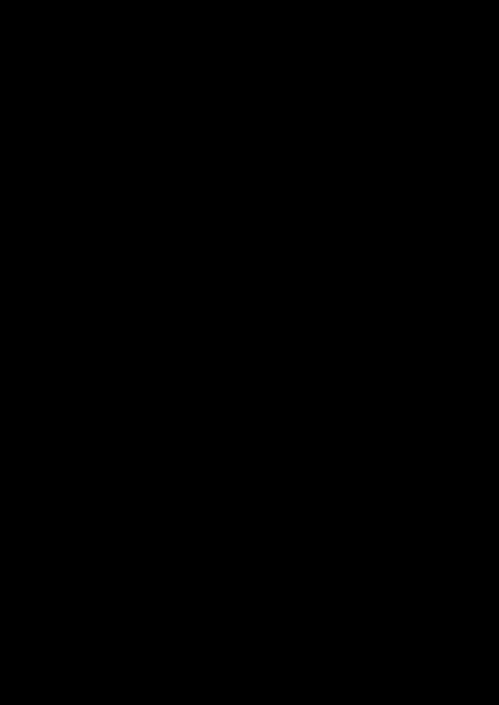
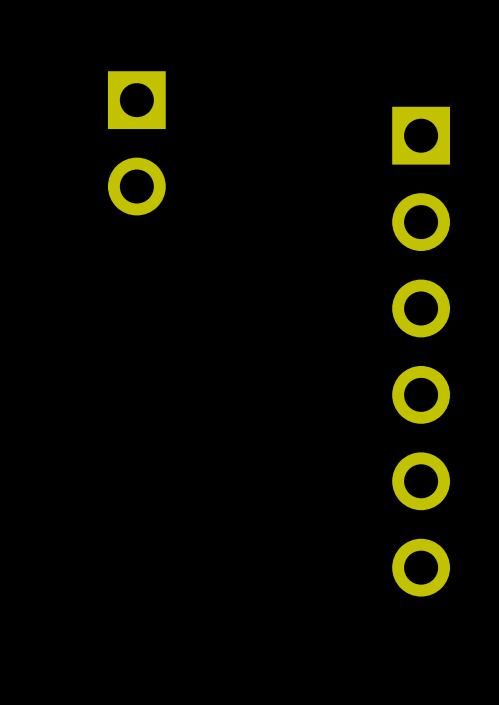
part: none -> (136, 143)
part: none -> (421, 351)

